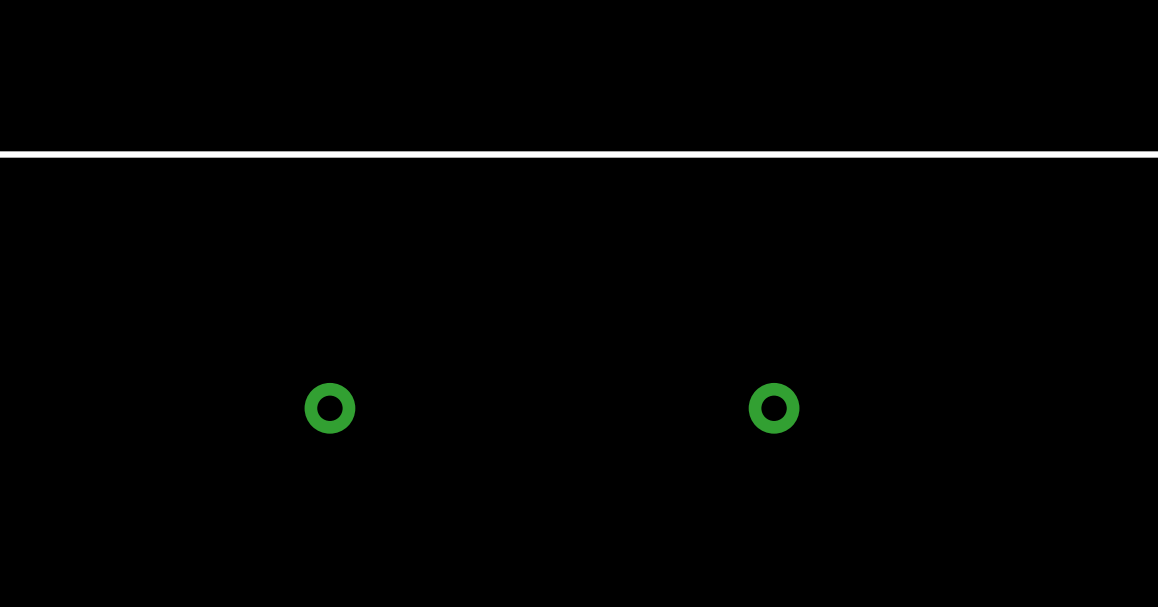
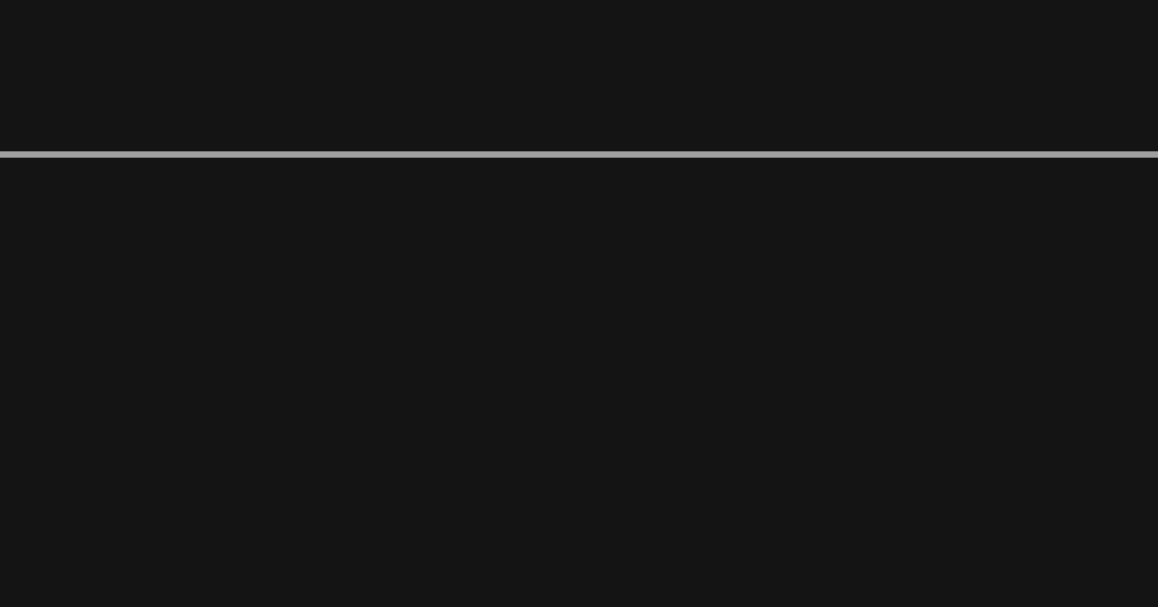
via: (329, 408) -> none
via: (774, 408) -> none

